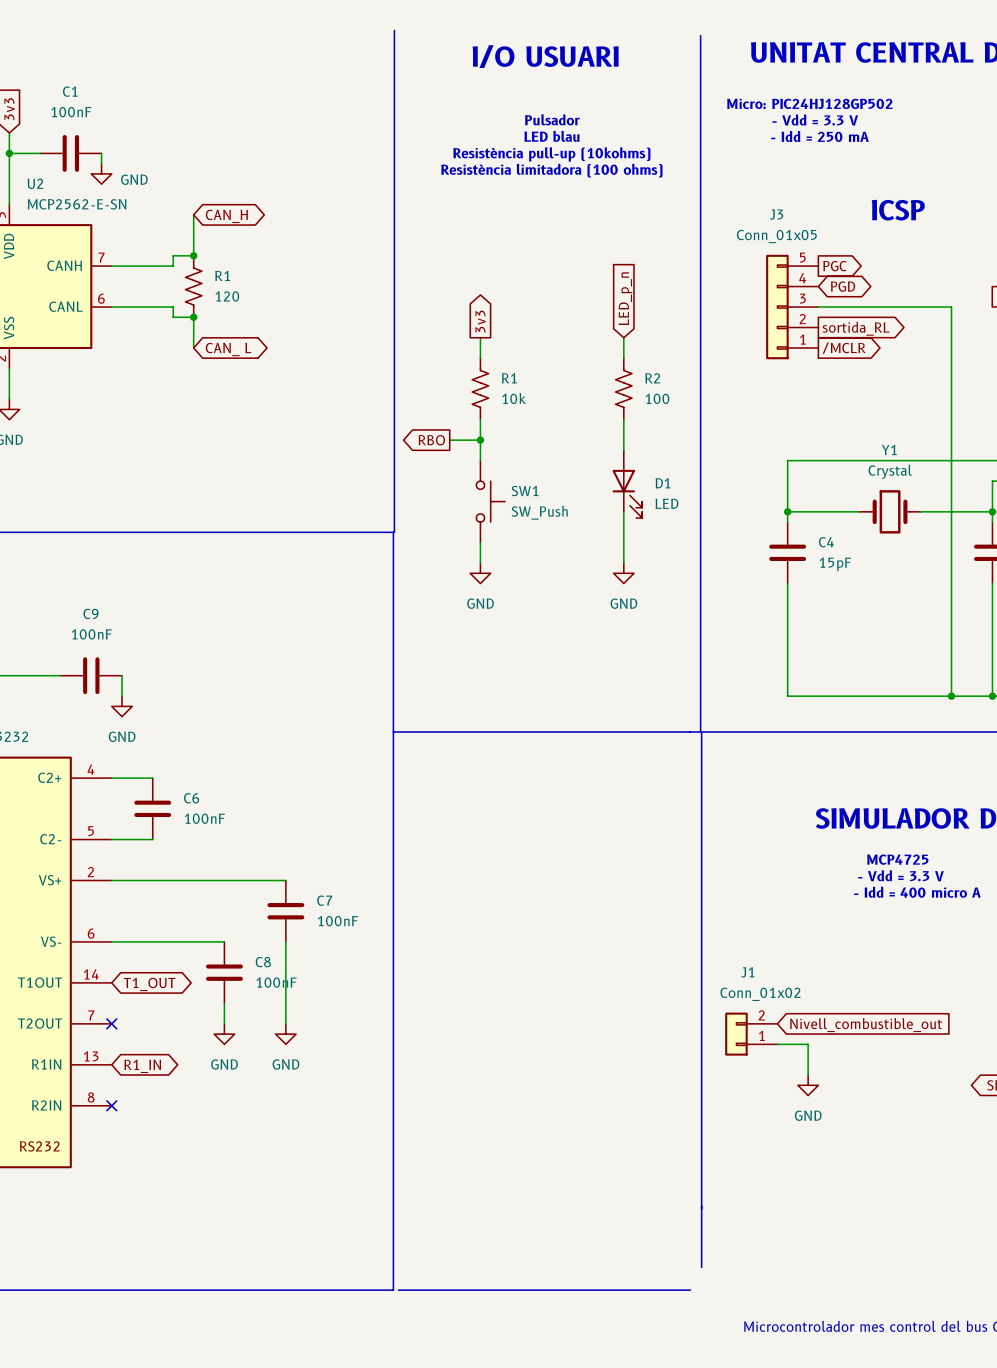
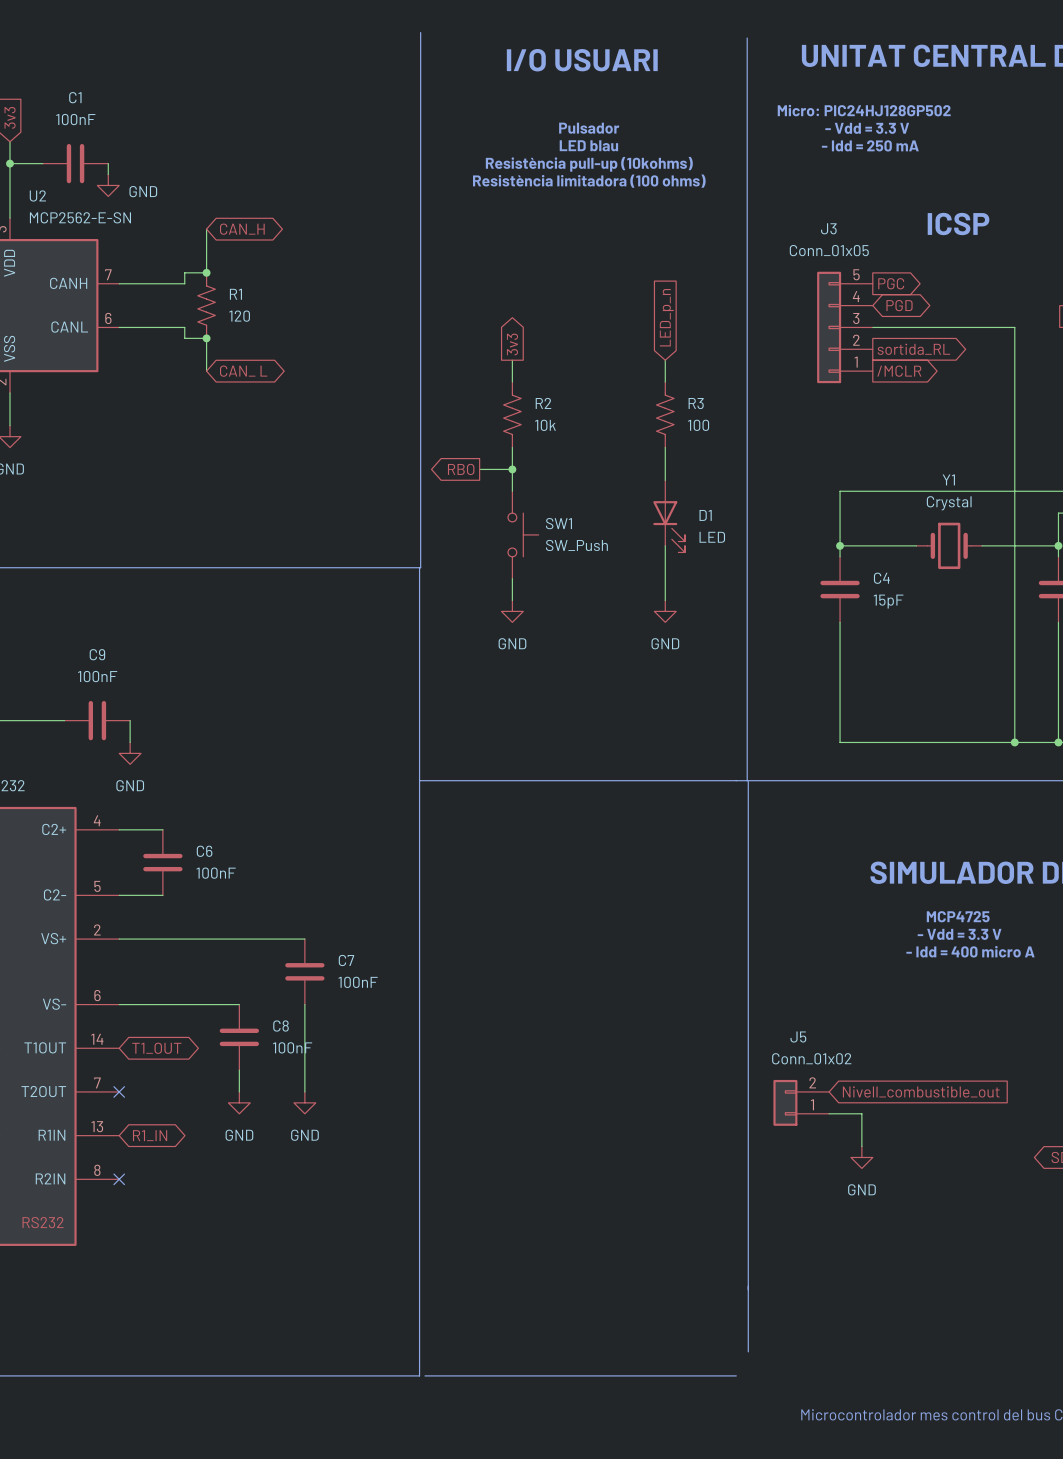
R1 name: R1 (509, 378) -> R2 (543, 403)
R2 name: R2 (652, 378) -> R3 (696, 403)
J1 name: J1 (747, 972) -> J5 (798, 1037)

